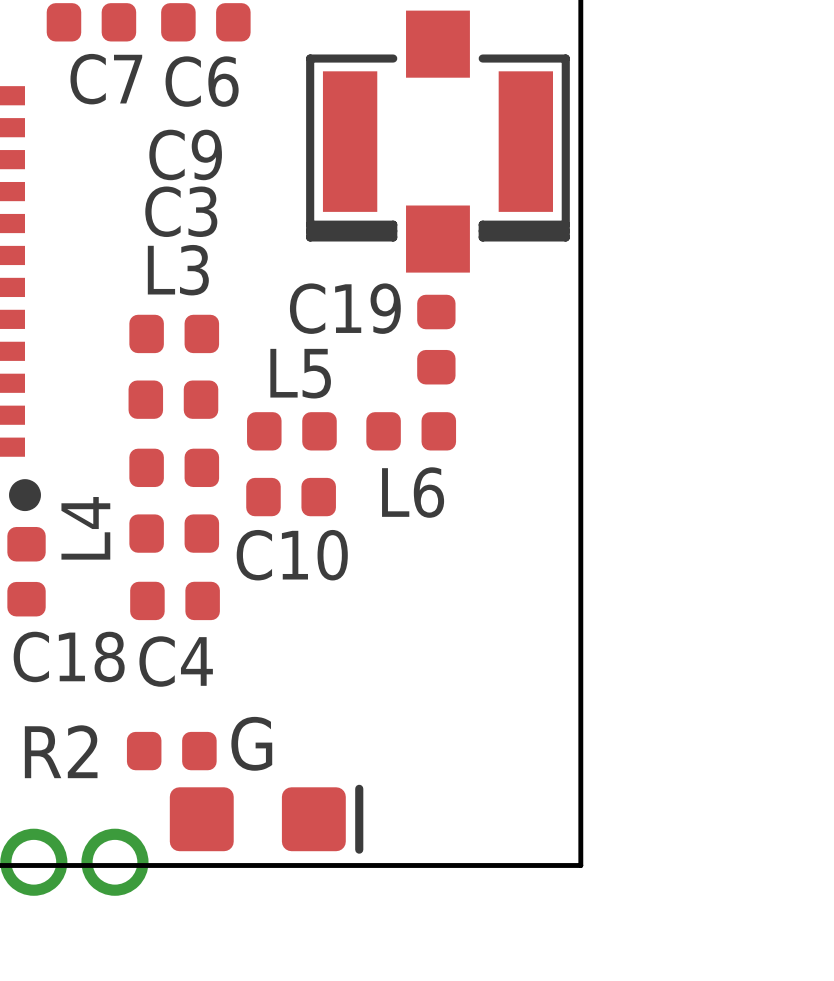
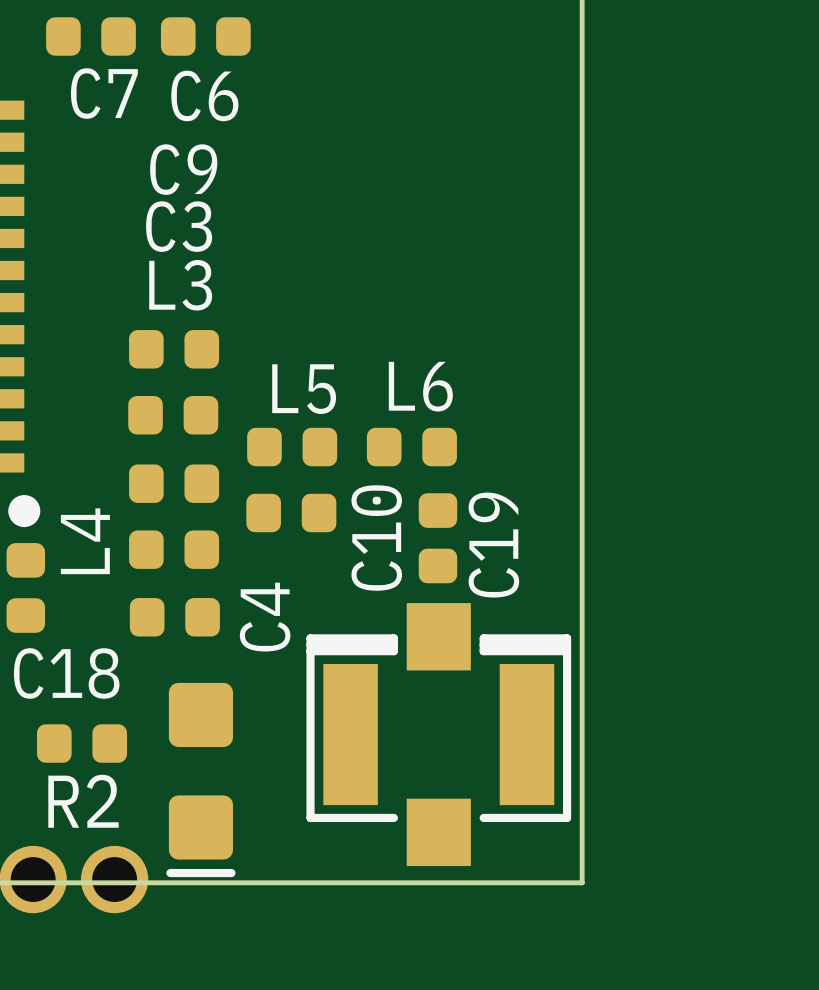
part rotation: 0° (437, 141) -> 180° (438, 734)
part position: (437, 141) -> (438, 734)
C19 name rotation: 0° (345, 308) -> 90° counterclockwise (493, 545)
C19 name position: C19 (345, 308) -> C19 (493, 545)
C19 position: (436, 339) -> (437, 538)
L6 name position: L6 (413, 492) -> L6 (420, 386)
C10 name rotation: 0° (292, 555) -> 90° counterclockwise (376, 538)
C4 name rotation: 0° (176, 661) -> 90° counterclockwise (265, 617)
C4 name position: C4 (176, 661) -> C4 (265, 617)
text: G (251, 743) -> none
R2 name position: R2 (61, 751) -> R2 (83, 801)
R2 position: (171, 751) -> (82, 743)
part rotation: 0° (266, 819) -> 90° clockwise (200, 780)

